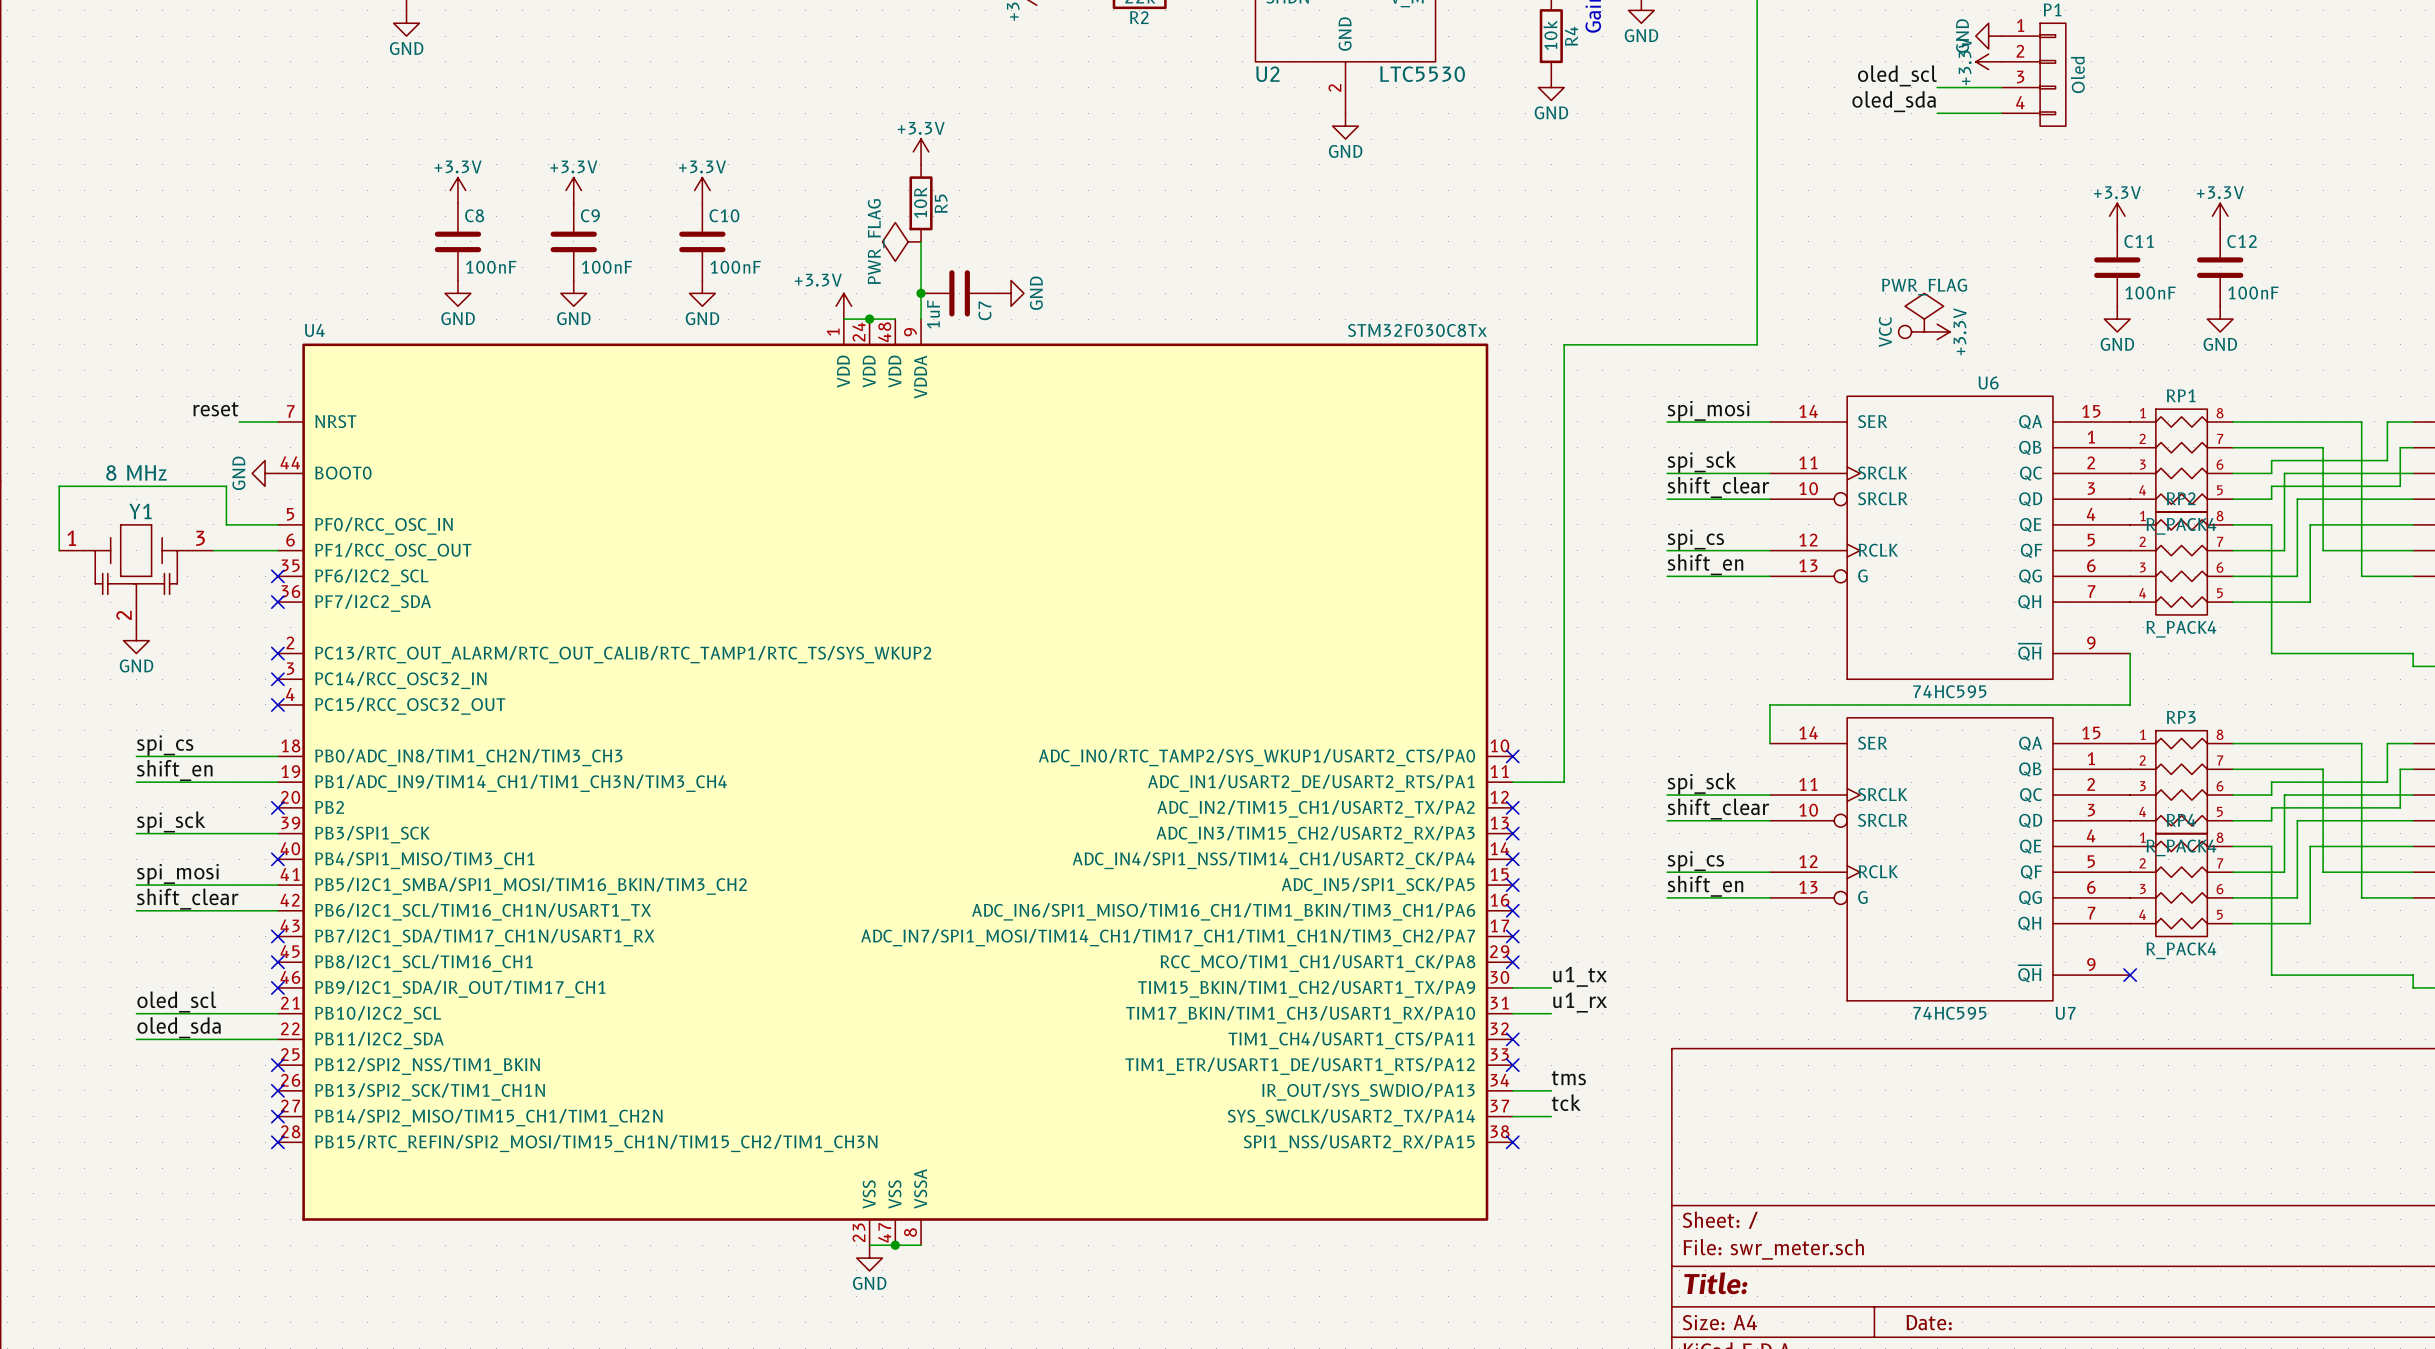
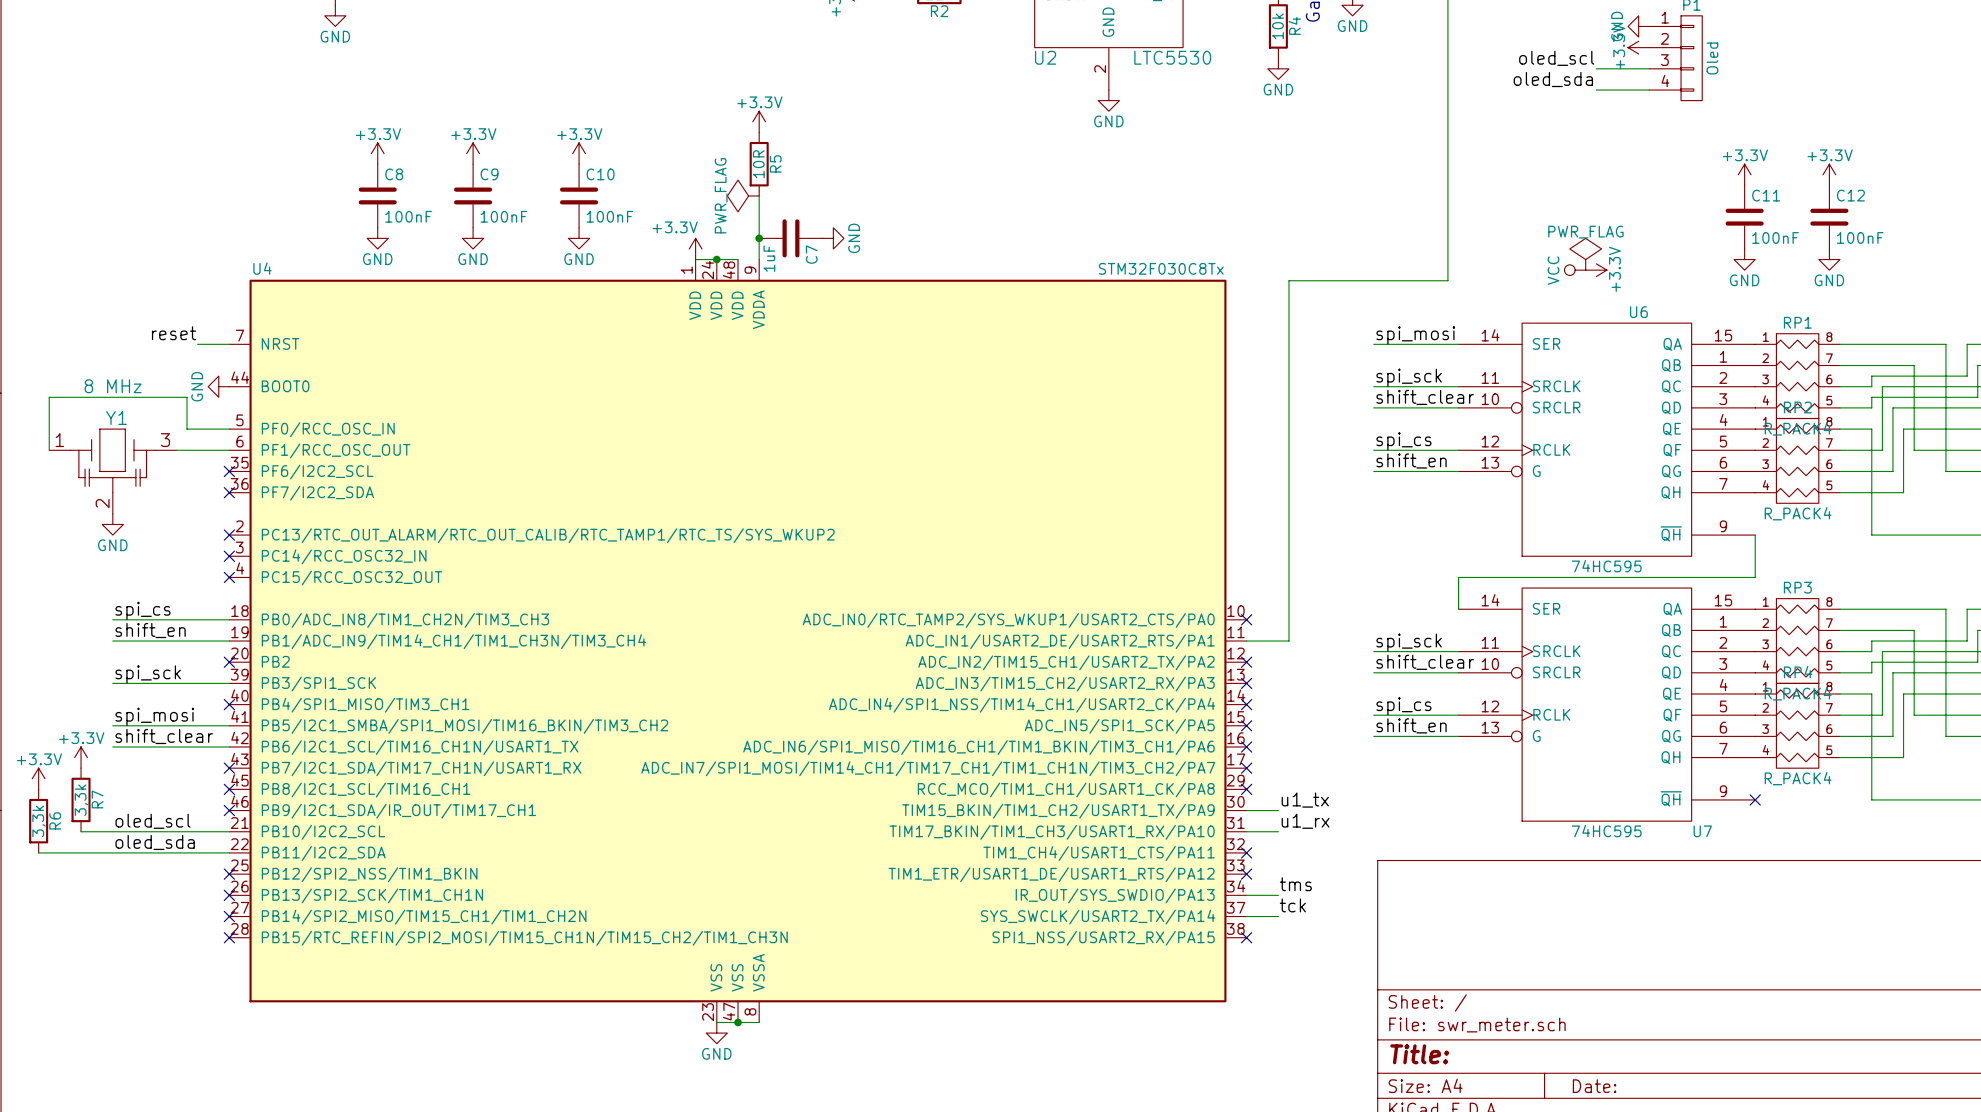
power symbol: none -> +3.3V (81, 757)
power symbol: none -> +3.3V (38, 778)
R7: none -> 3,3k (81, 799)
R6: none -> 3,3k (38, 821)
wire: none -> (81, 831) (112, 831)
wire: none -> (38, 852) (112, 852)

